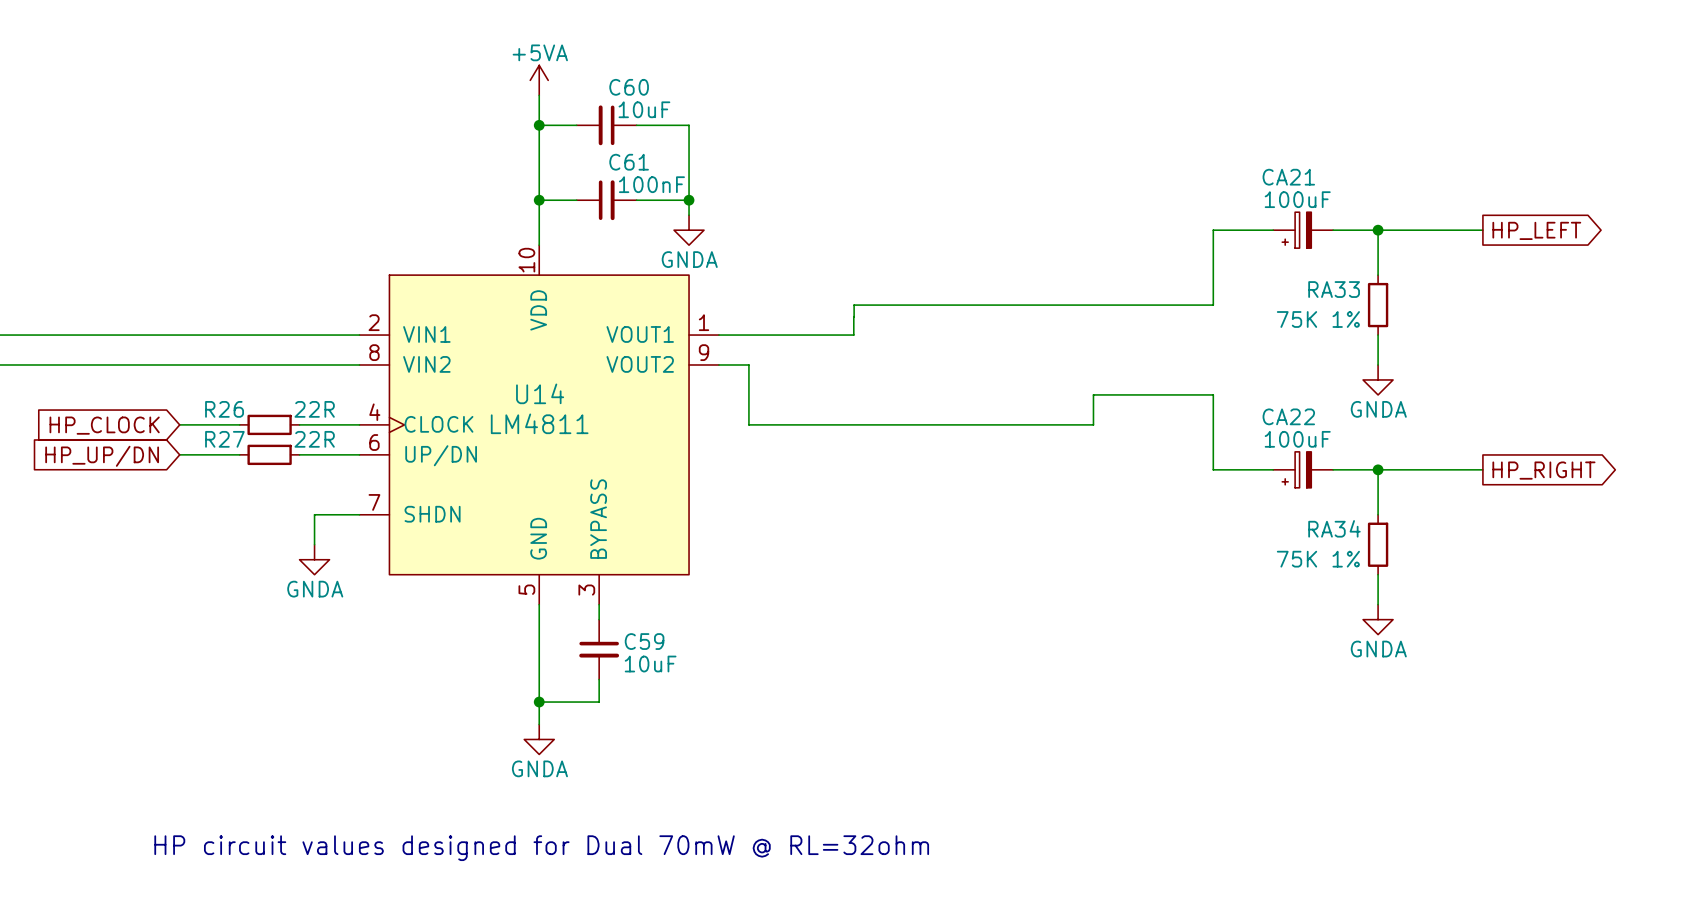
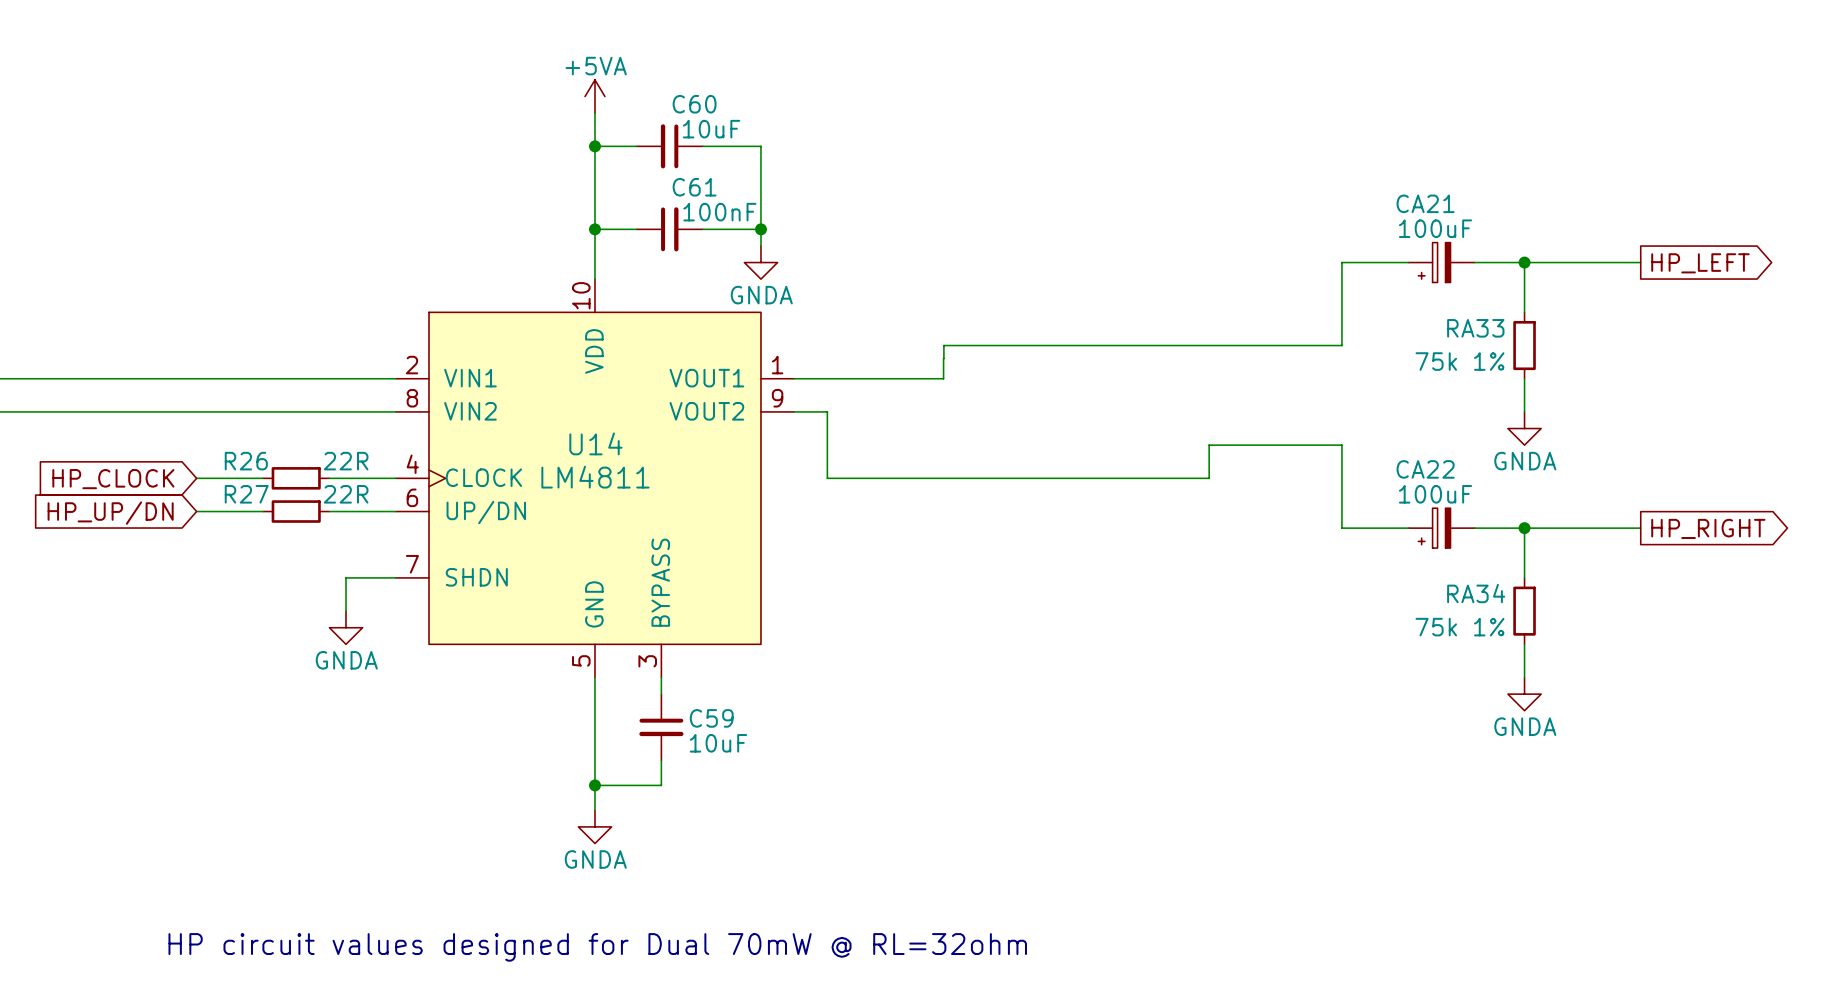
RA33 value: 75K 1% (1318, 319) -> 75k 1% (1459, 361)
RA34 value: 75K 1% (1318, 559) -> 75k 1% (1459, 627)

